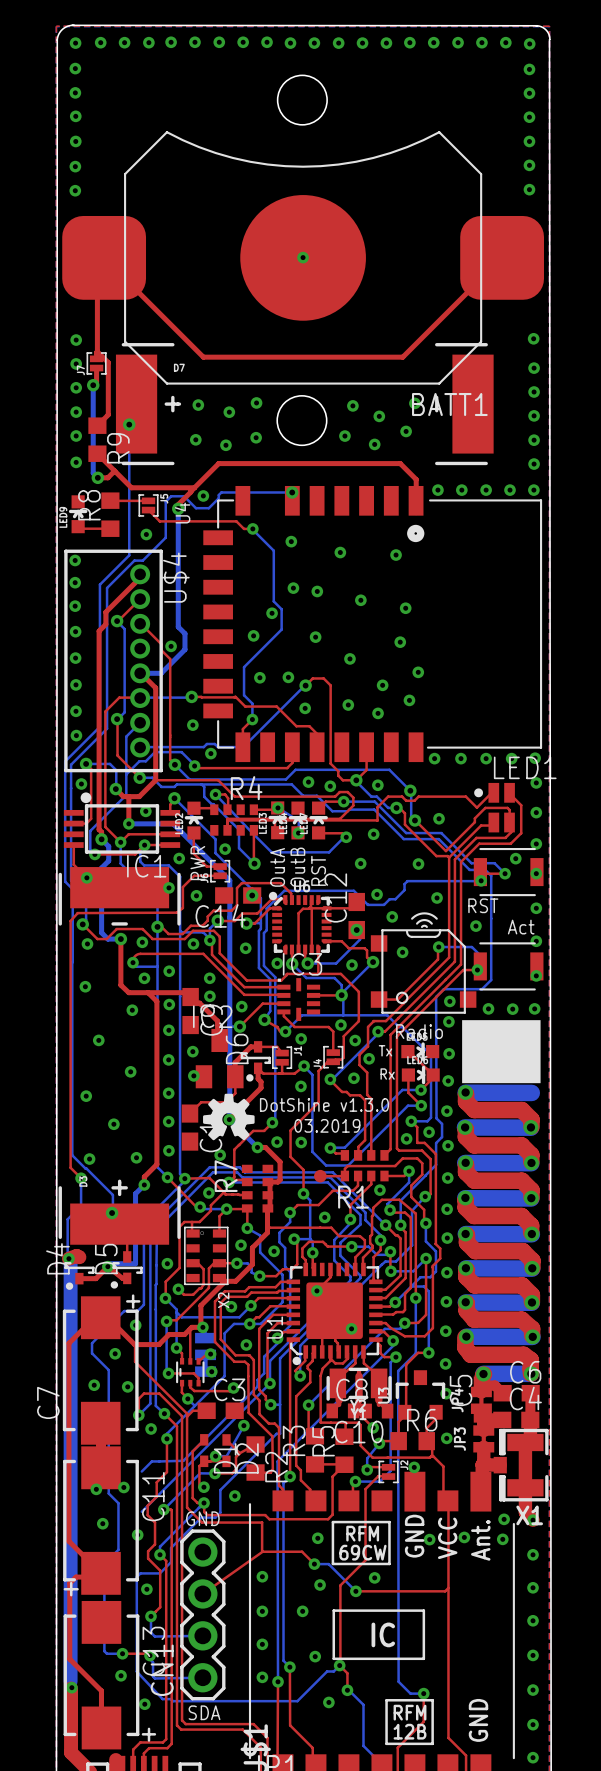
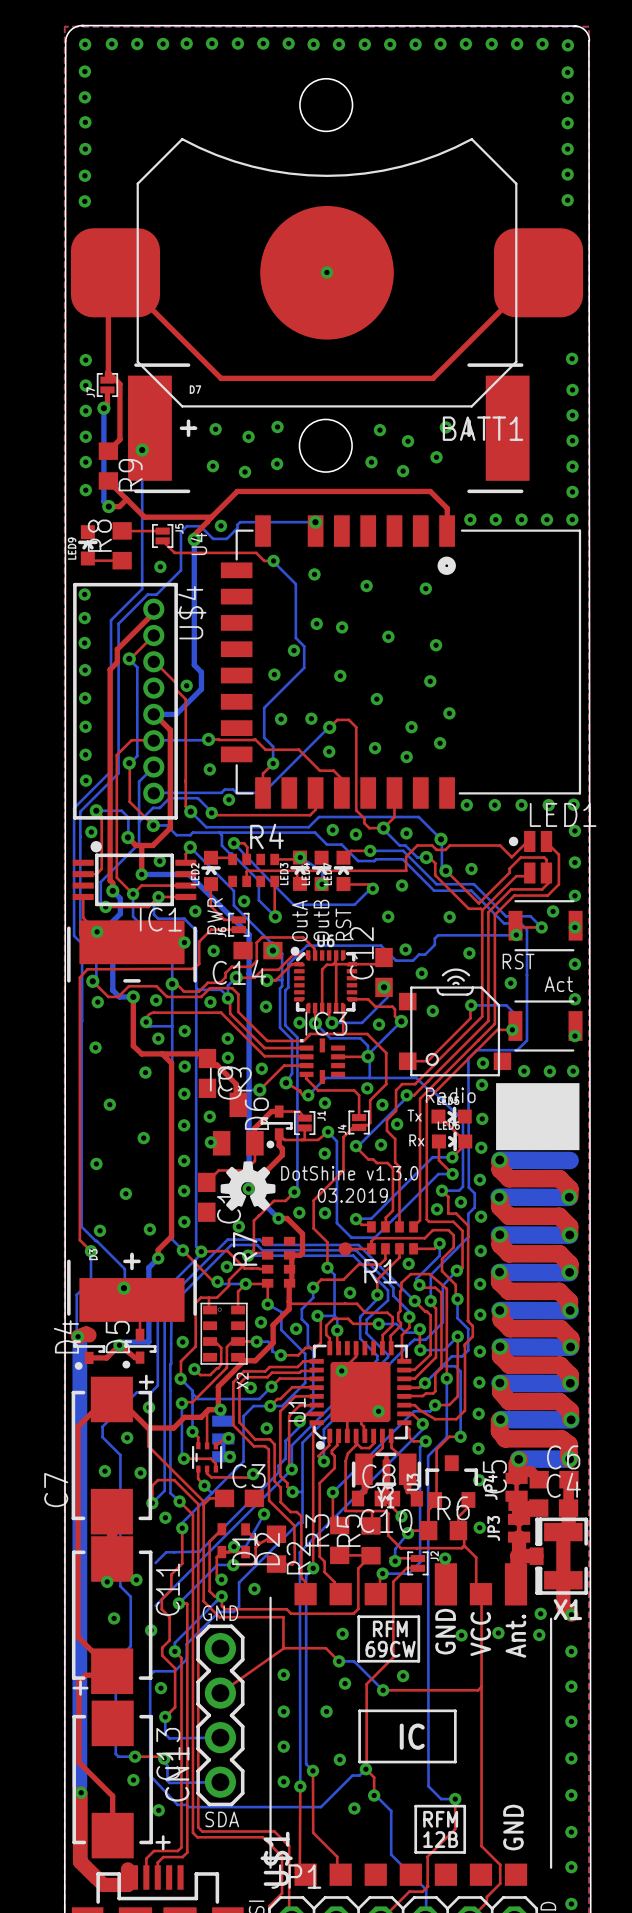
top track: (155, 780) (218, 780) (234, 796) (335, 796) (339, 792) (347, 792) (353, 797) (353, 805) (340, 818) (227, 818) (227, 821) -> none

